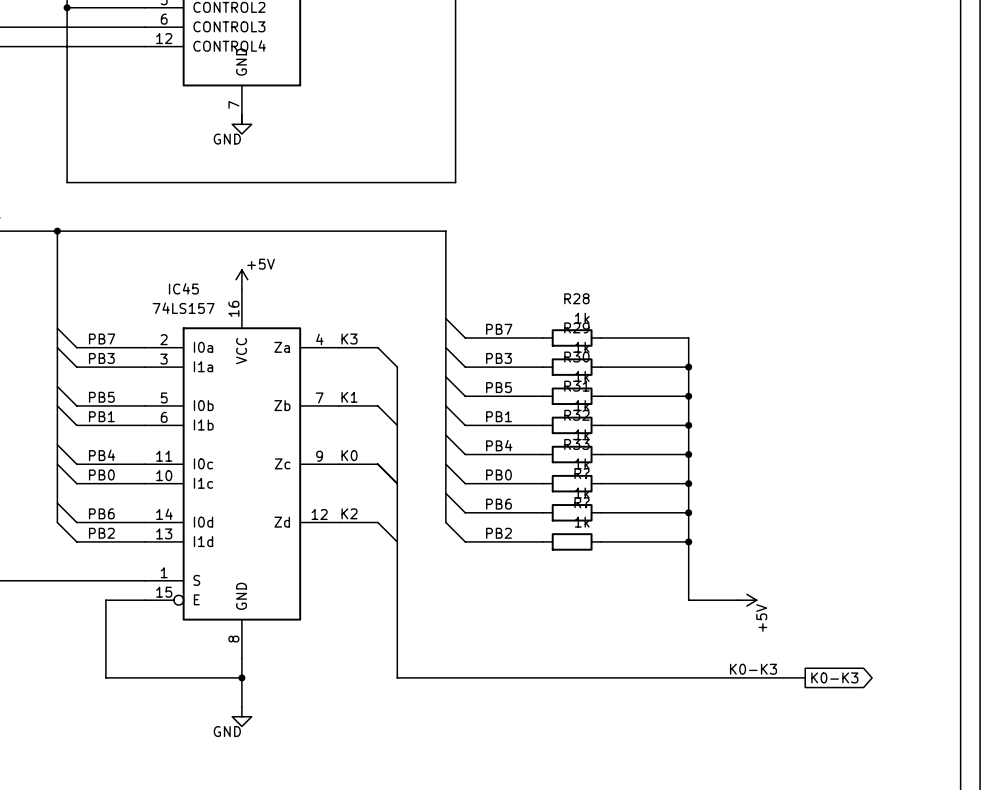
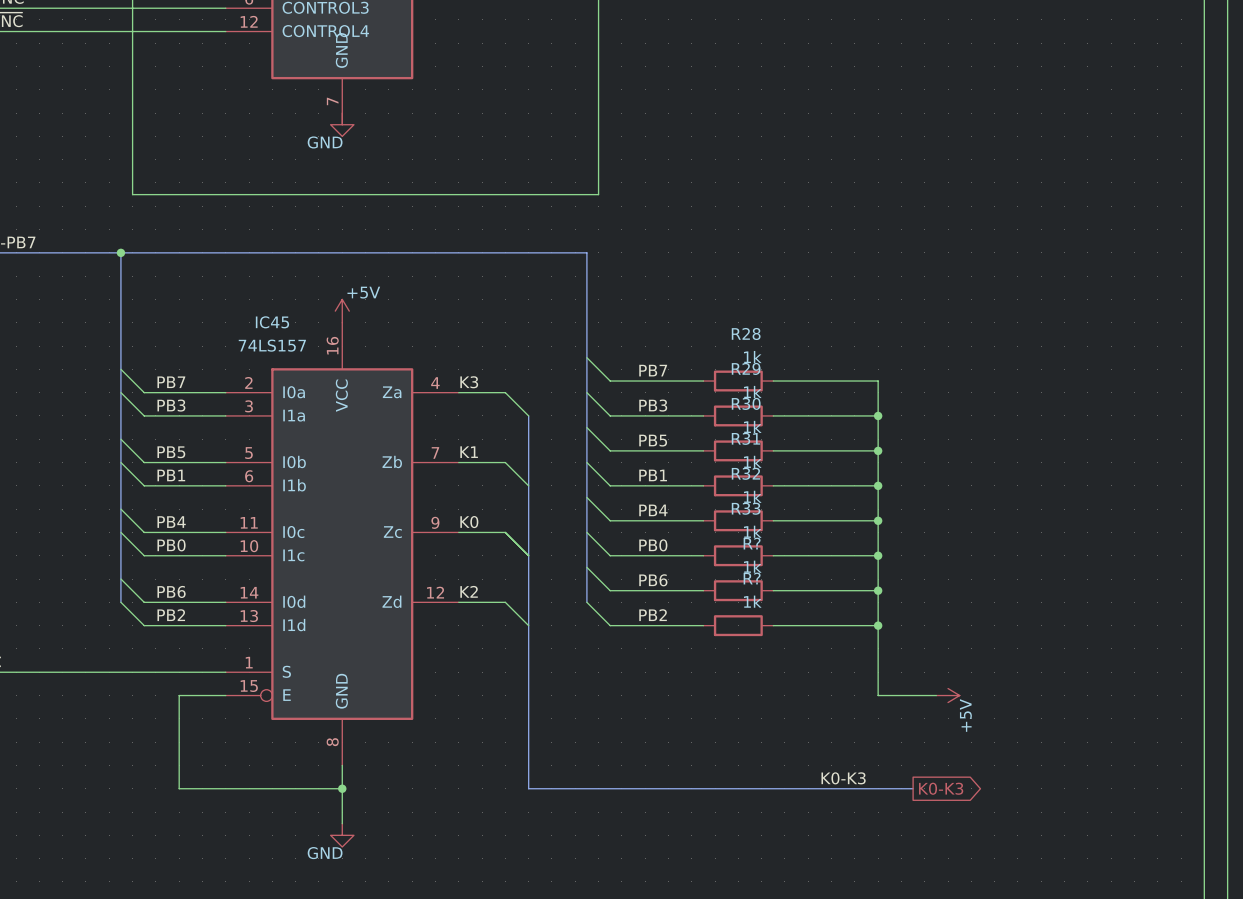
label position: K0-K3 (753, 669) -> K0-K3 (843, 778)
bus: (717, 677) (805, 677) -> none
global label position: K0-K3 (834, 677) -> K0-K3 (941, 788)

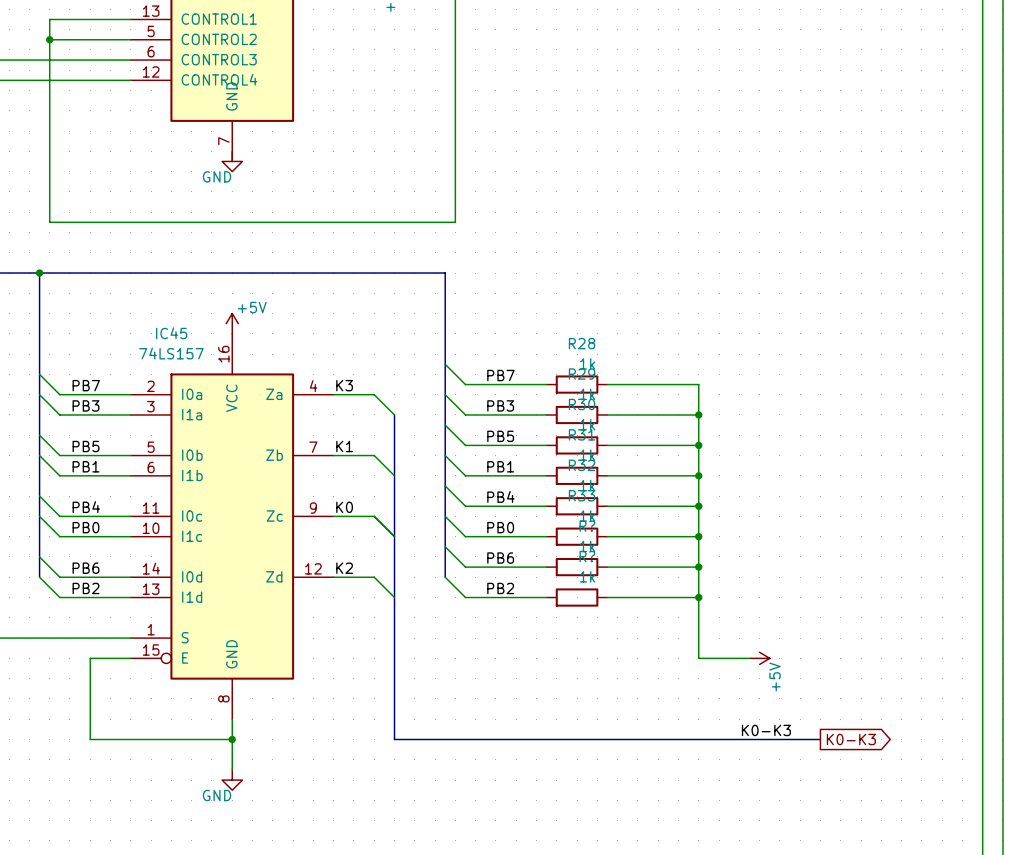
label position: K0-K3 (843, 778) -> K0-K3 (766, 730)
bus: none -> (729, 739) (820, 739)
global label position: K0-K3 (941, 788) -> K0-K3 (851, 739)

